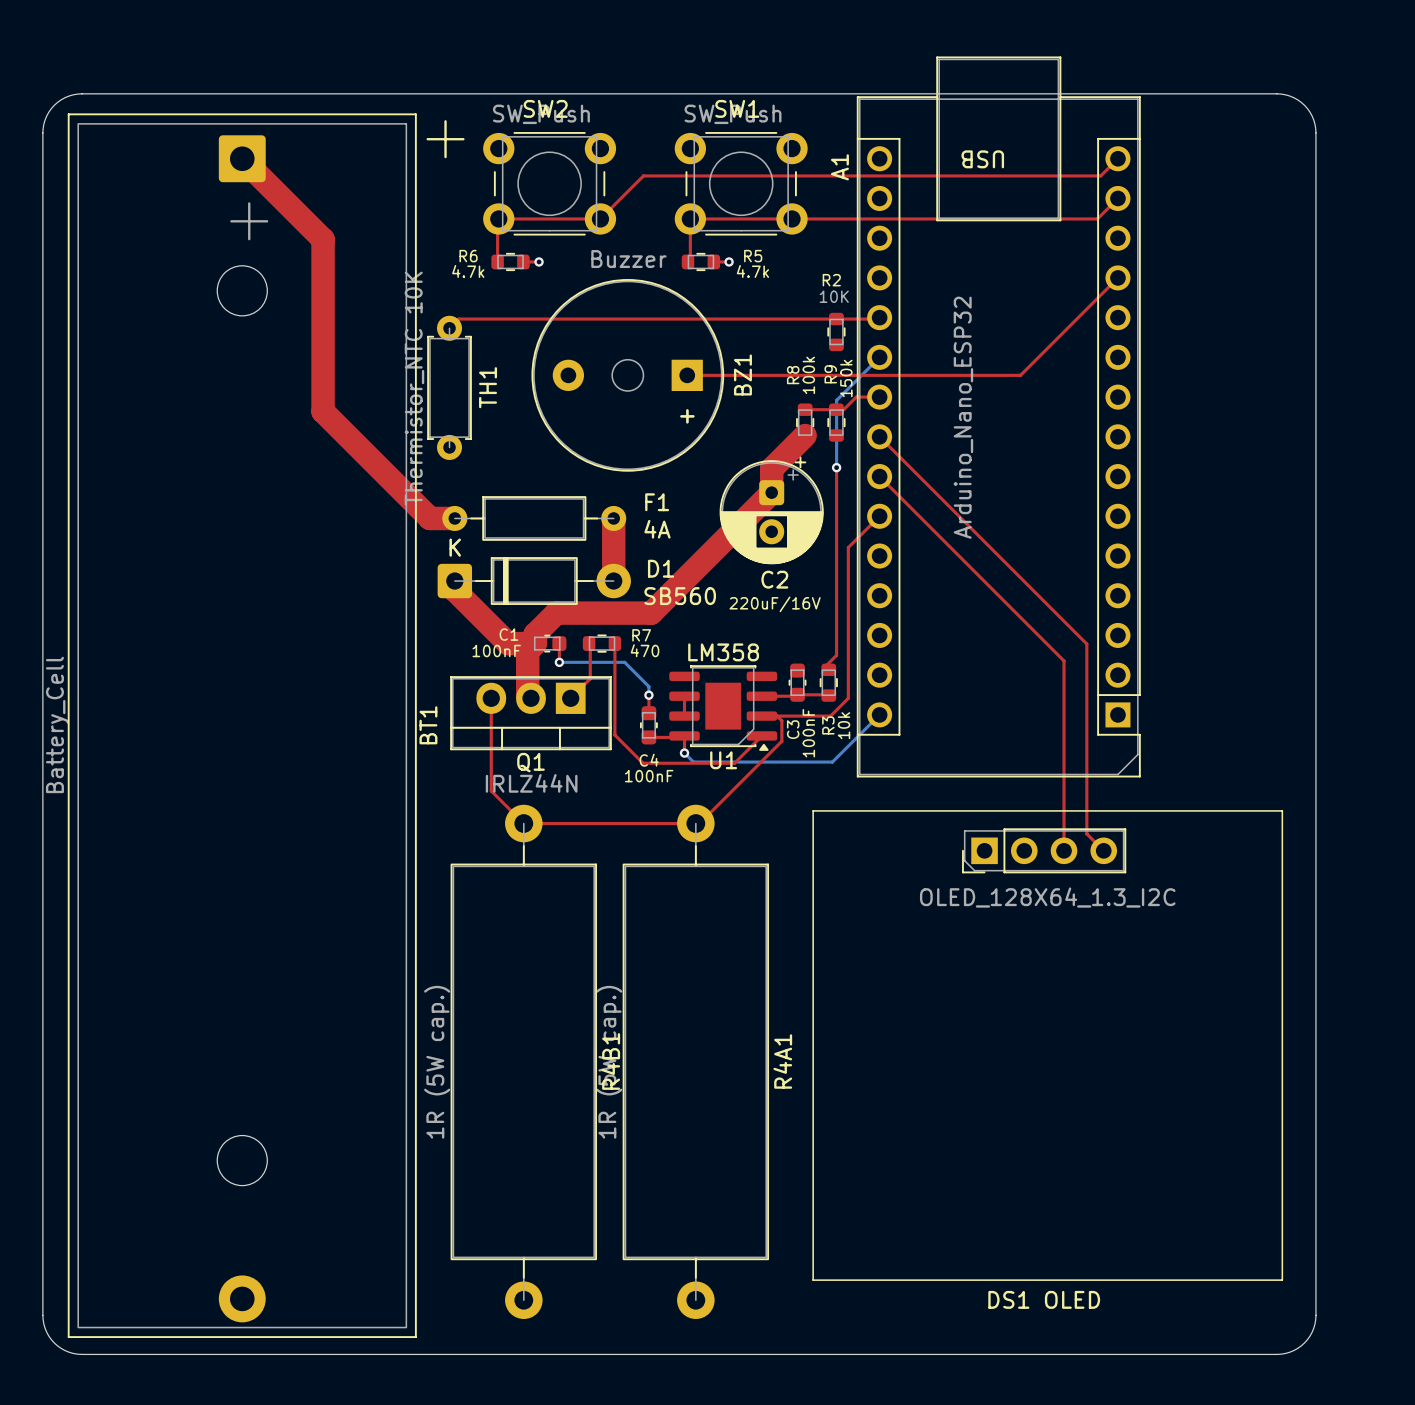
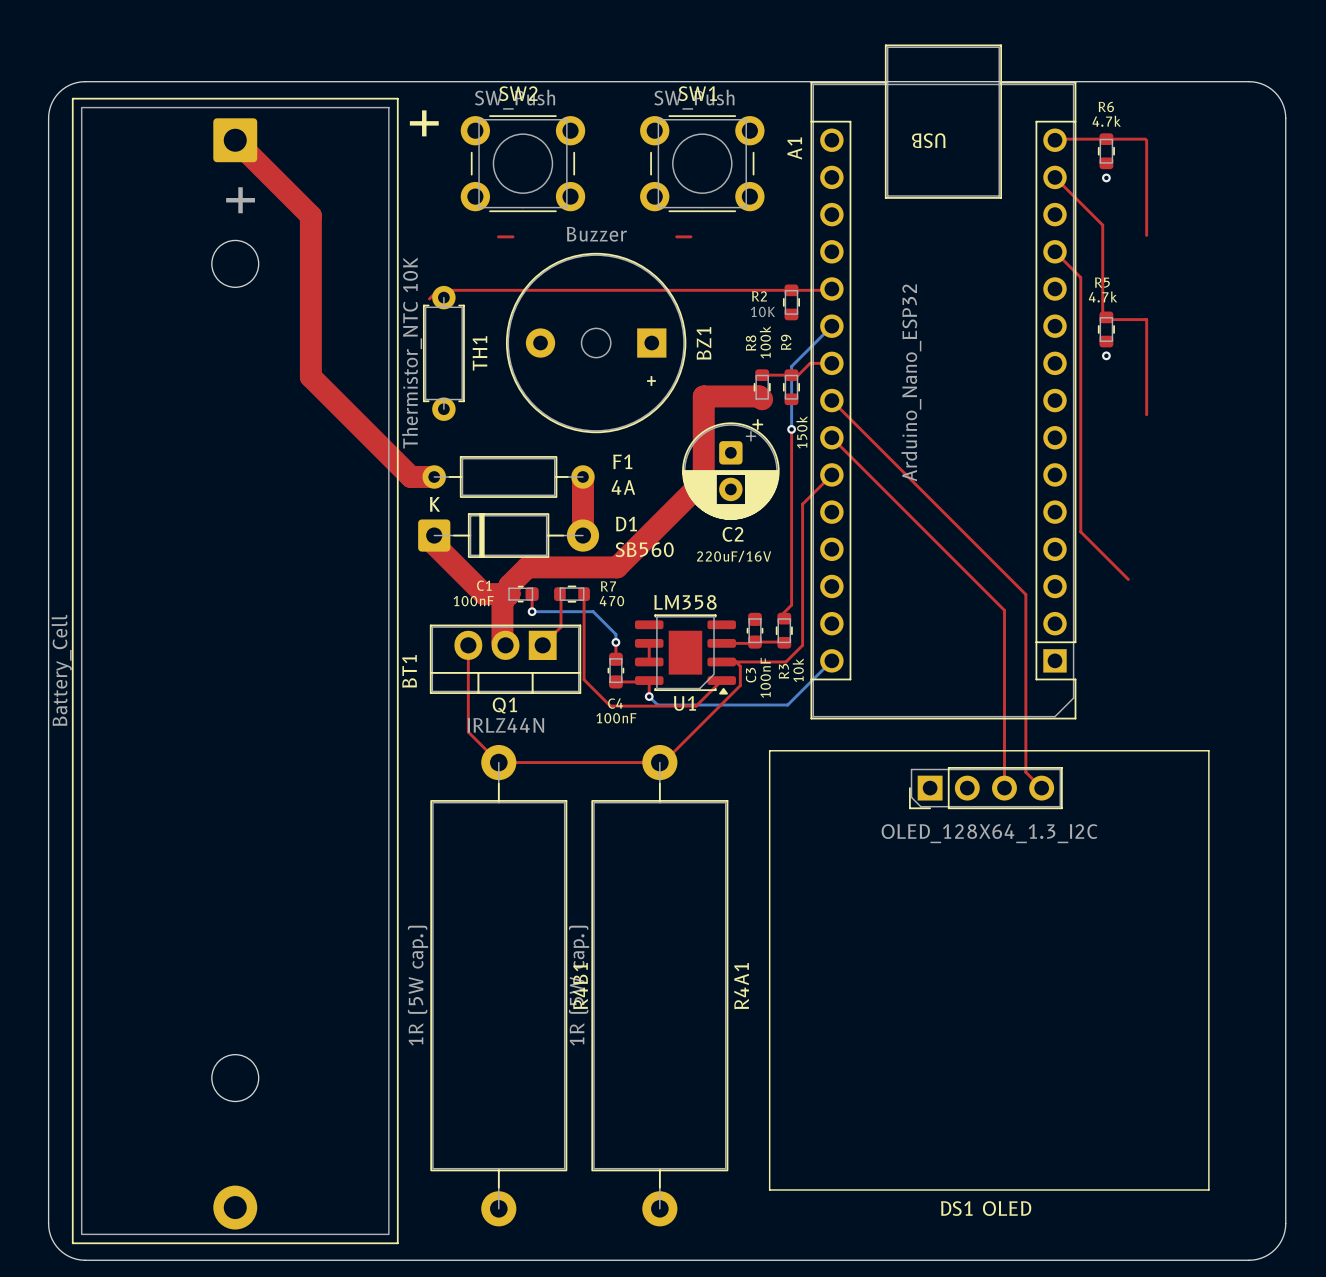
board edge: (42, 135) (45, 120) (54, 105) (65, 97) (81, 93) (1276, 93) (1293, 97) (1304, 105) (1313, 120) (1315, 132) (1315, 1315) (1313, 1328) (1304, 1342) (1293, 1350) (1276, 1354) (81, 1354) (65, 1350) (54, 1342) (45, 1328) (42, 1315) -> (48, 118) (50, 106) (59, 92) (73, 83) (85, 81) (1249, 81) (1261, 83) (1271, 89) (1282, 102) (1285, 118) (1285, 1223) (1283, 1235) (1275, 1249) (1265, 1256) (1249, 1260) (85, 1260) (73, 1258) (59, 1249) (50, 1235) (48, 1222)
top track: none -> (1056, 139) (1145, 139)
top track: (1117, 158) (1100, 175) (643, 175) (600, 218) (498, 218) -> none
top track: none -> (1146, 140) (1146, 235)
top track: (1117, 198) (1097, 218) (690, 218) (690, 259) (684, 265) -> (1055, 177) (1102, 225) (1102, 313) (1108, 319) (1146, 319) (1146, 414)
via: none -> (1106, 177)
top track: (497, 220) (497, 261) -> none
R5 name position: R5 (753, 256) -> R5 (1102, 282)
R6 rotation: 0° (510, 261) -> 90° clockwise (1106, 151)
R6 position: (510, 261) -> (1106, 151)
via: (539, 261) -> none
R5 rotation: 0° (700, 261) -> 90° clockwise (1106, 329)
R5 position: (700, 261) -> (1106, 329)
via: (729, 261) -> none
R5 value position: 4.7k (752, 271) -> 4.7k (1103, 296)
top track: (1117, 277) (1020, 375) (687, 375) -> (1055, 251) (1080, 277) (1080, 531) (1128, 579)
R2 name position: R2 (831, 280) -> R2 (759, 296)
R2 value position: 10K (834, 296) -> 10K (762, 311)
R9 value position: 150k (846, 378) -> 150k (801, 432)
TH1 position: (449, 387) -> (443, 353)
via: none -> (1106, 355)
top track: (805, 435) (771, 468) (771, 492) (651, 613) (556, 613) (554, 615) -> (762, 399) (759, 396) (703, 396) (703, 480) (617, 567) (527, 567)

